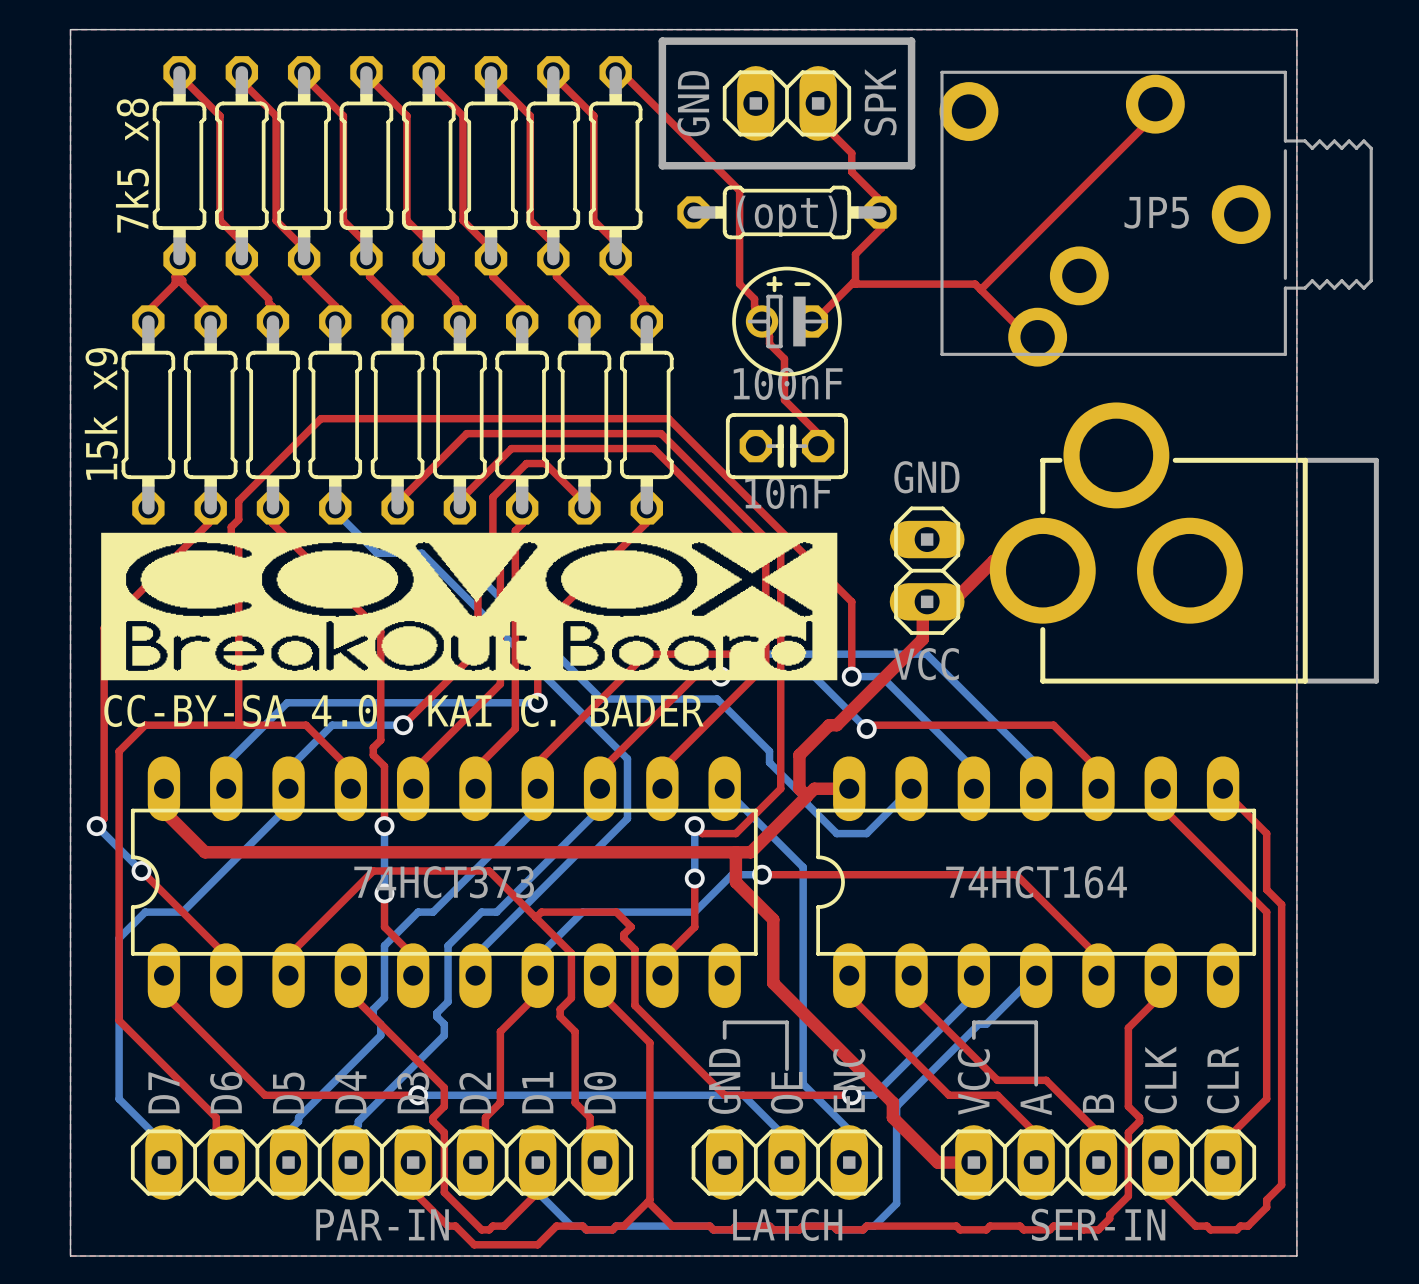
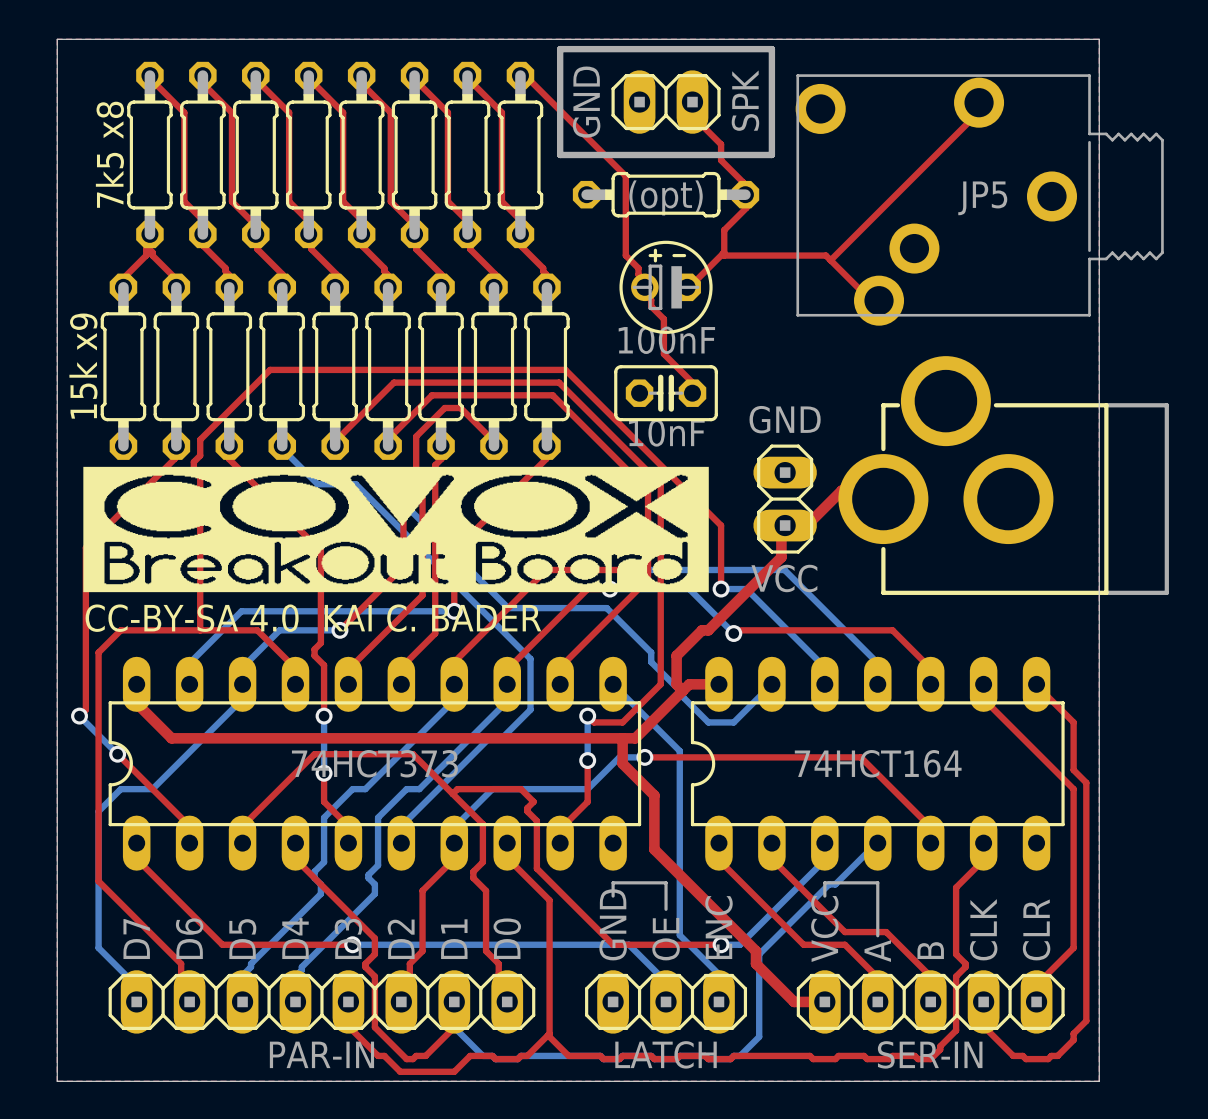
line: (786, 1053) (786, 1069) -> none

